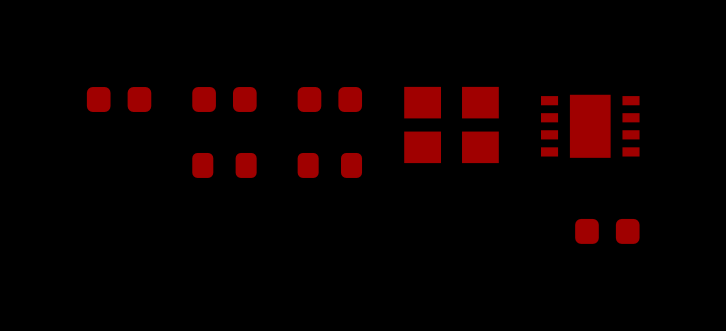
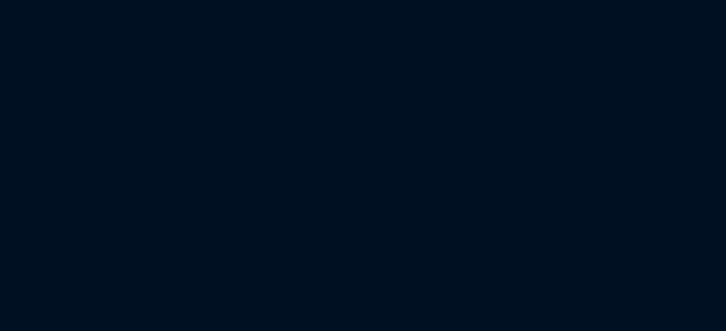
part: (119, 99) -> none
part: (224, 99) -> none
part: (329, 99) -> none
part: (451, 124) -> none
part: (590, 126) -> none
part: (224, 165) -> none
part: (329, 165) -> none
part: (607, 231) -> none

